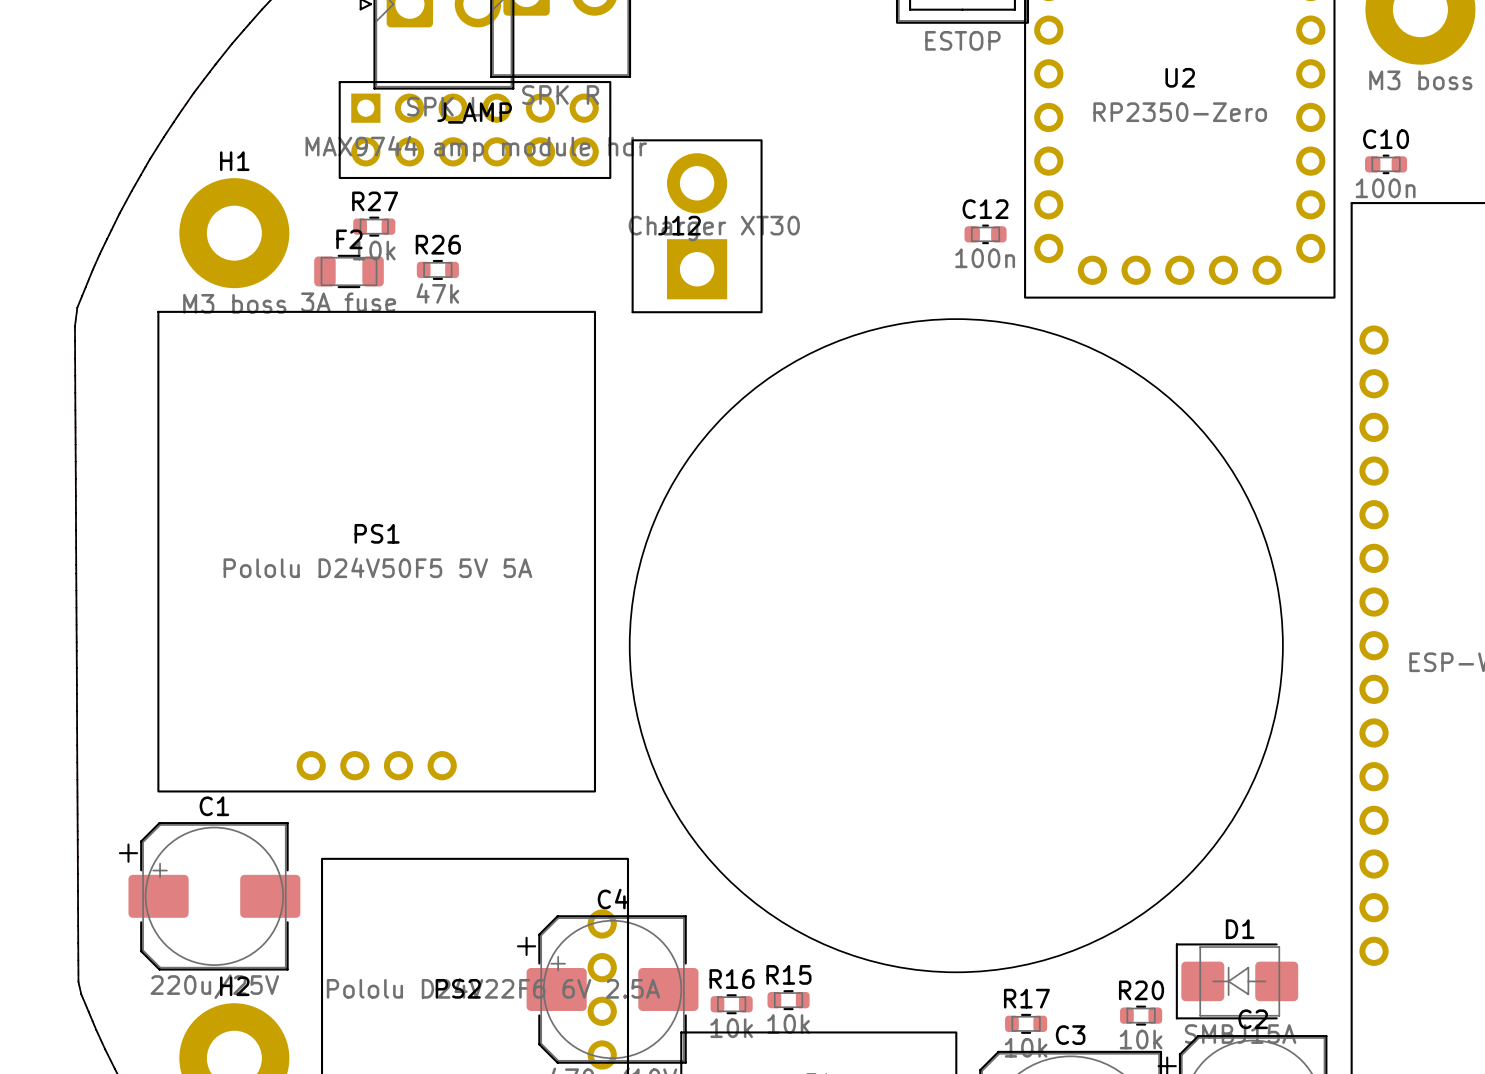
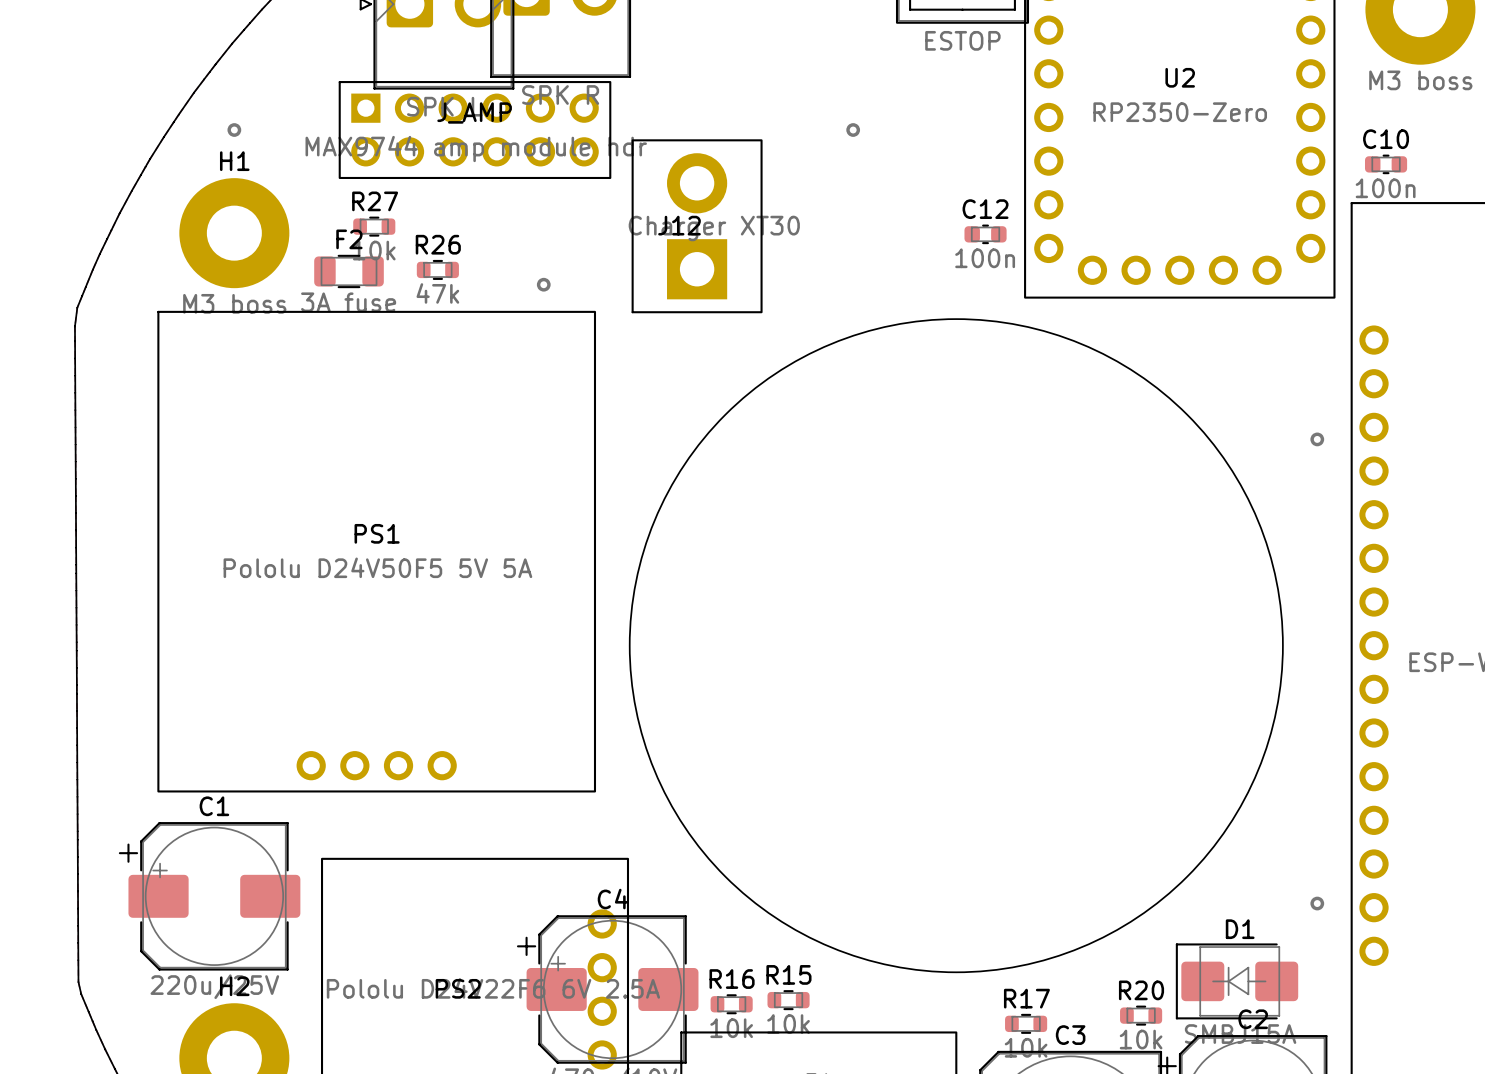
via: none -> (234, 130)
via: none -> (853, 130)
via: none -> (543, 284)
via: none -> (1317, 439)
via: none -> (1317, 903)

